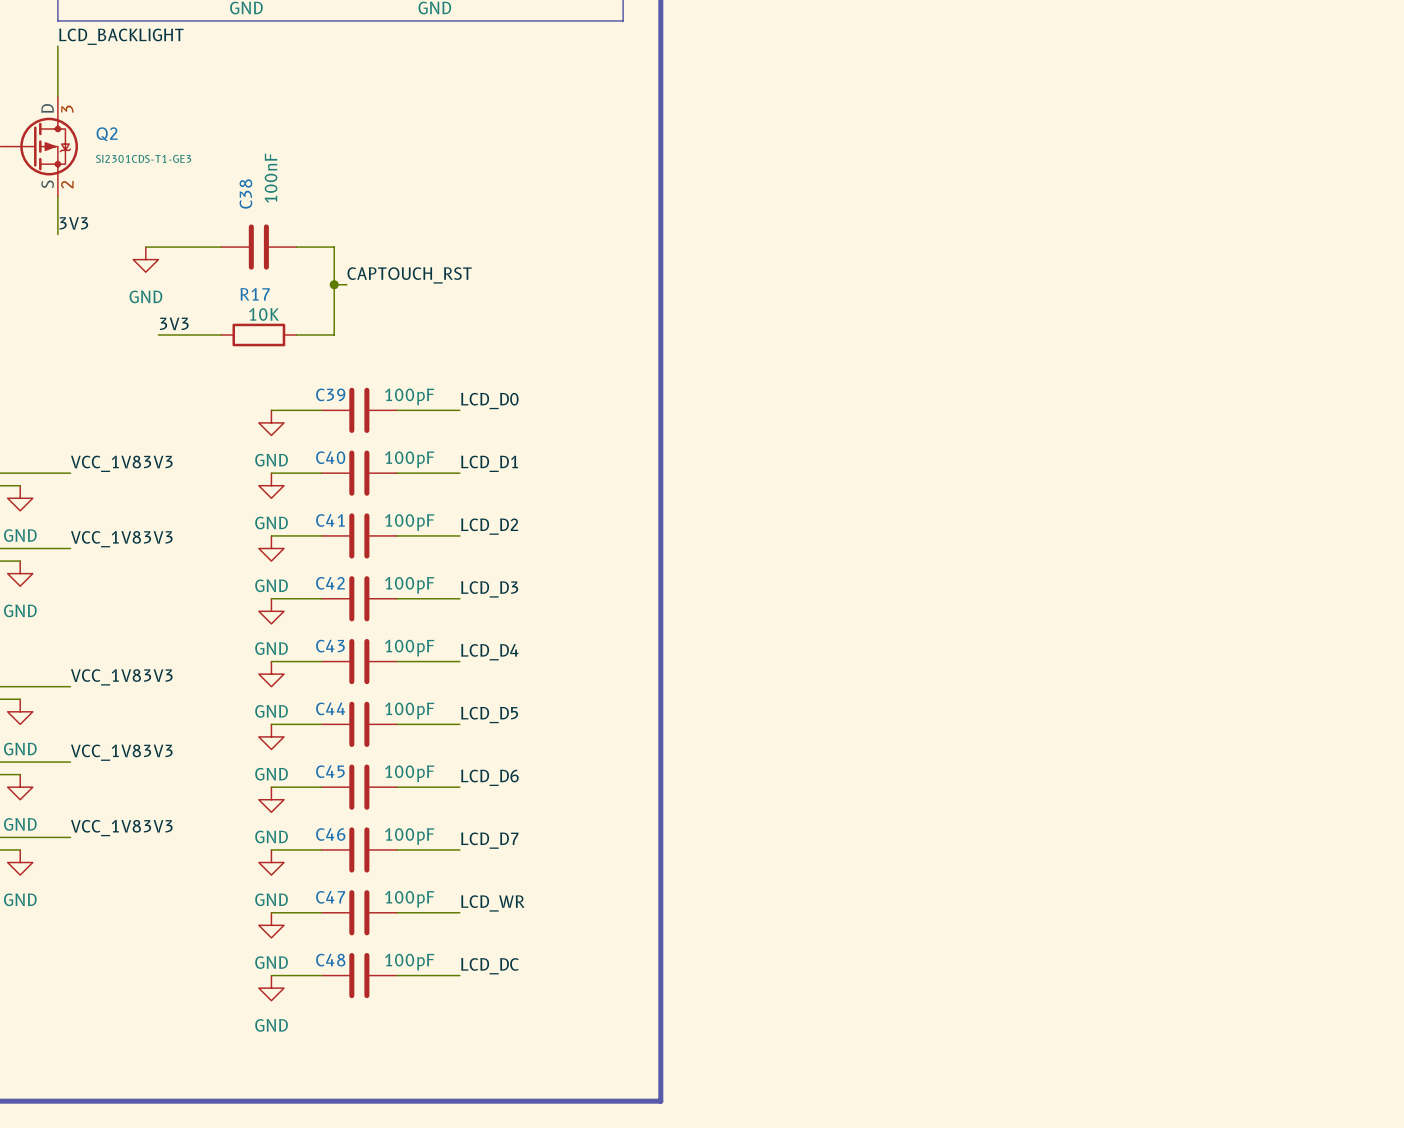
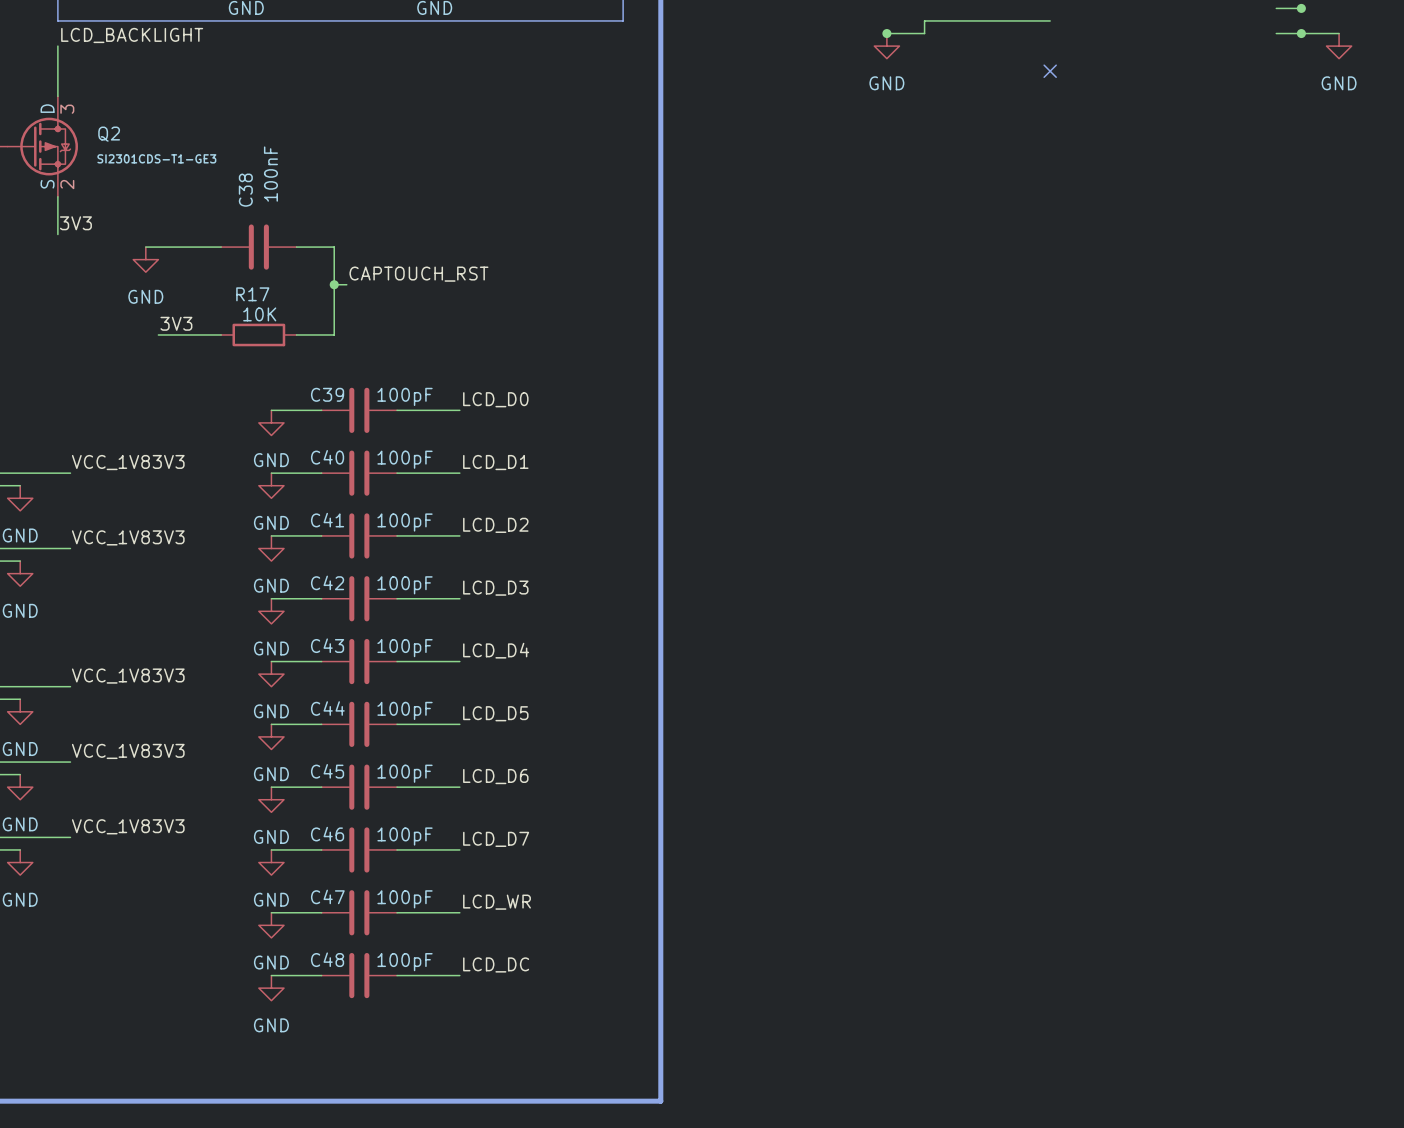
wire: none -> (1276, 8) (1301, 8)
junction: none -> (1301, 8)
wire: none -> (1050, 20) (924, 20) (924, 33) (886, 33)
junction: none -> (886, 33)
wire: none -> (1276, 33) (1339, 33)
junction: none -> (1301, 33)
power symbol: none -> GND (886, 46)
power symbol: none -> GND (1339, 46)
no-connect mark: none -> (1050, 71)

